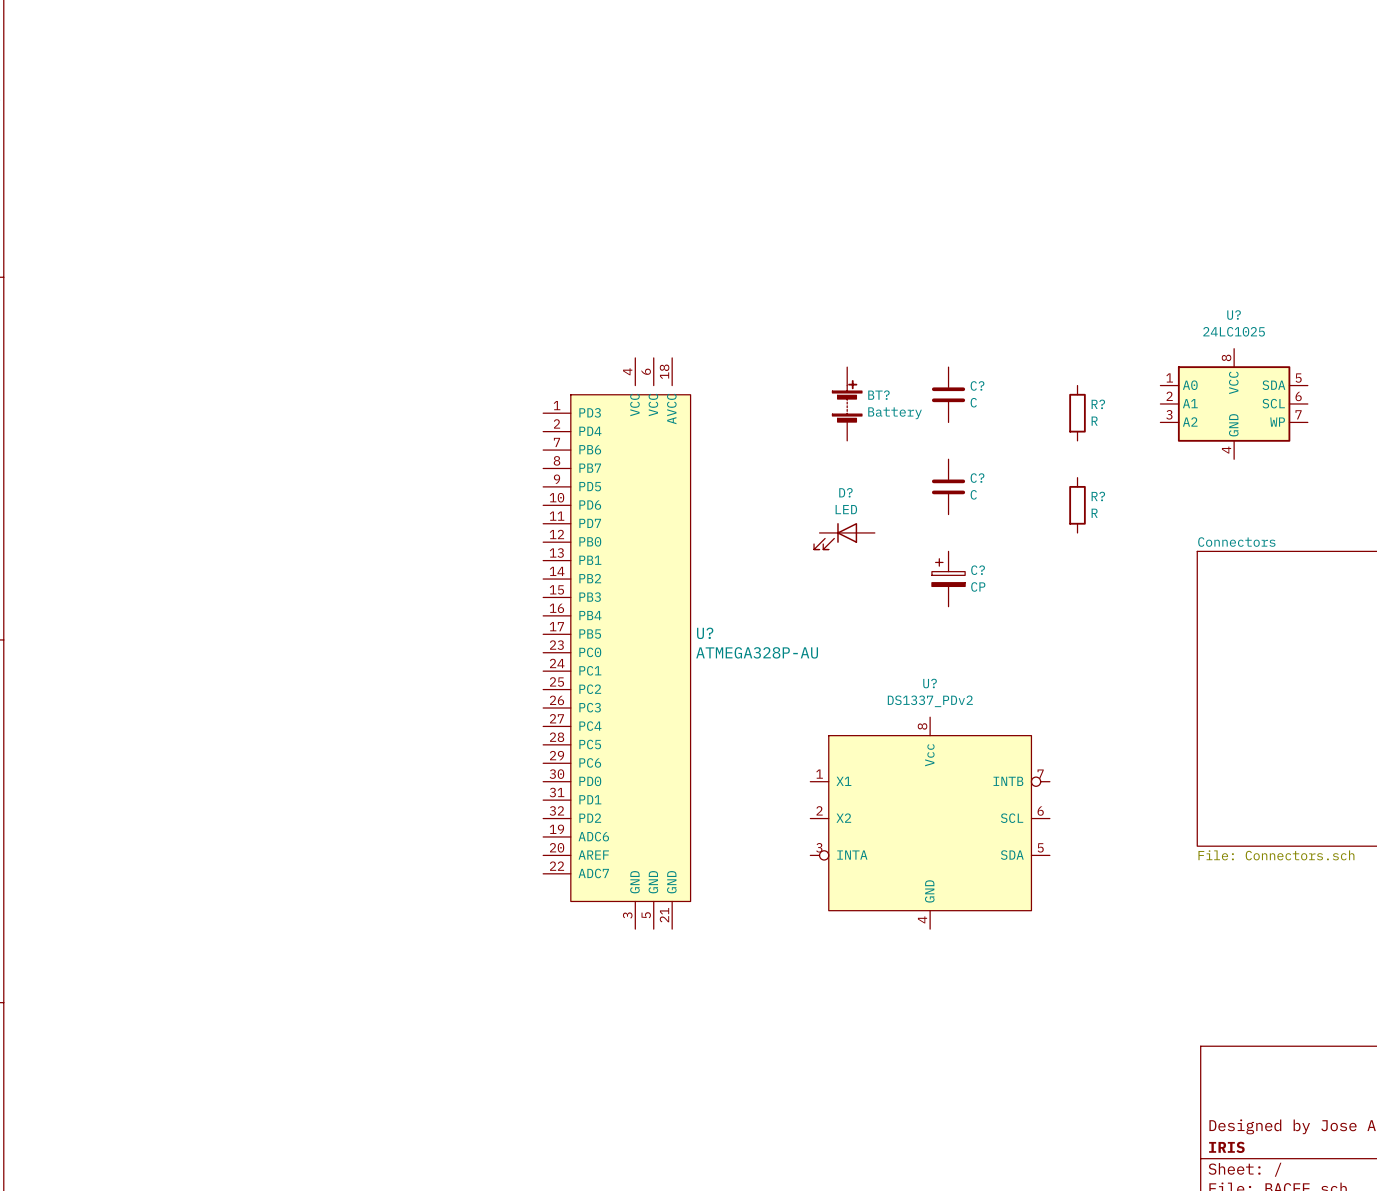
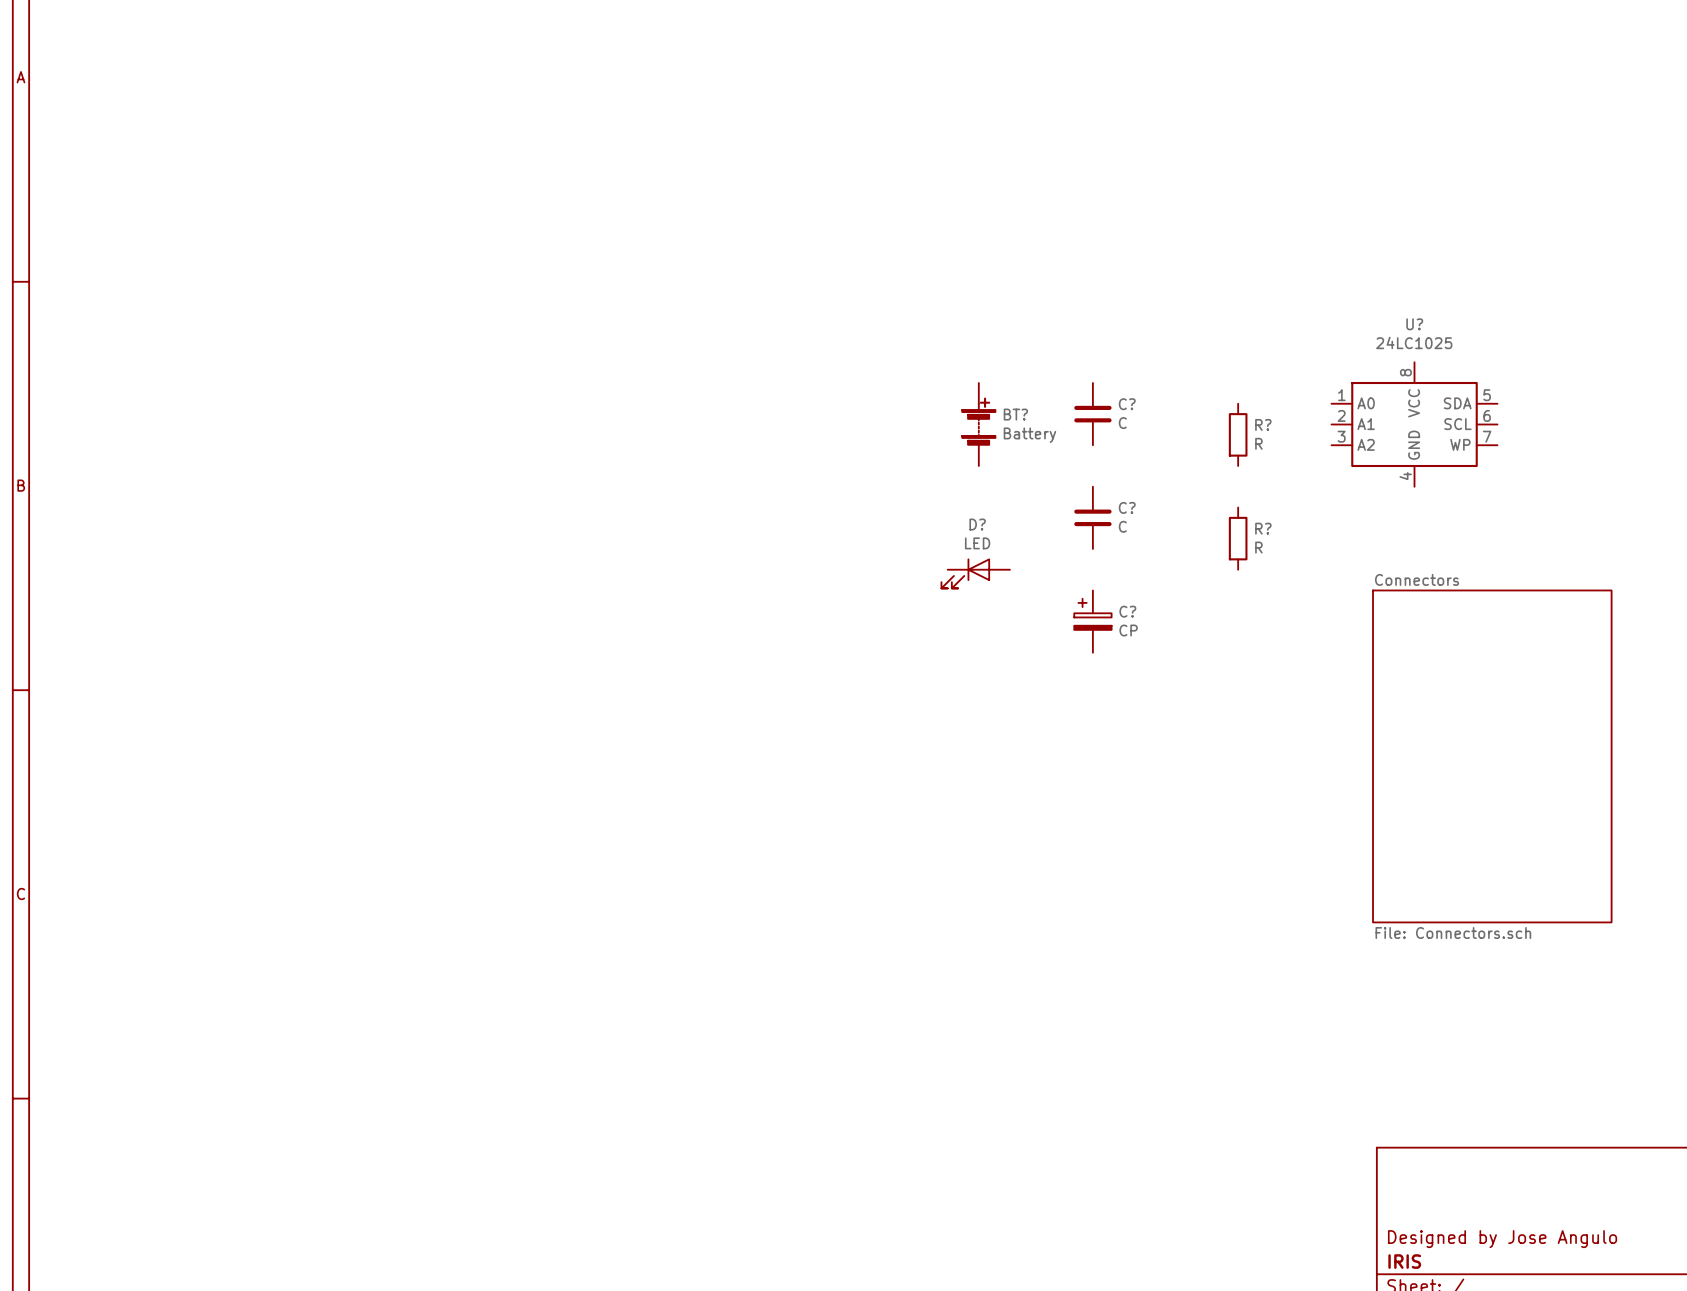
U?: ATMEGA328P-AU (616, 643) -> none
U?: DS1337_PDv2 (930, 823) -> none

